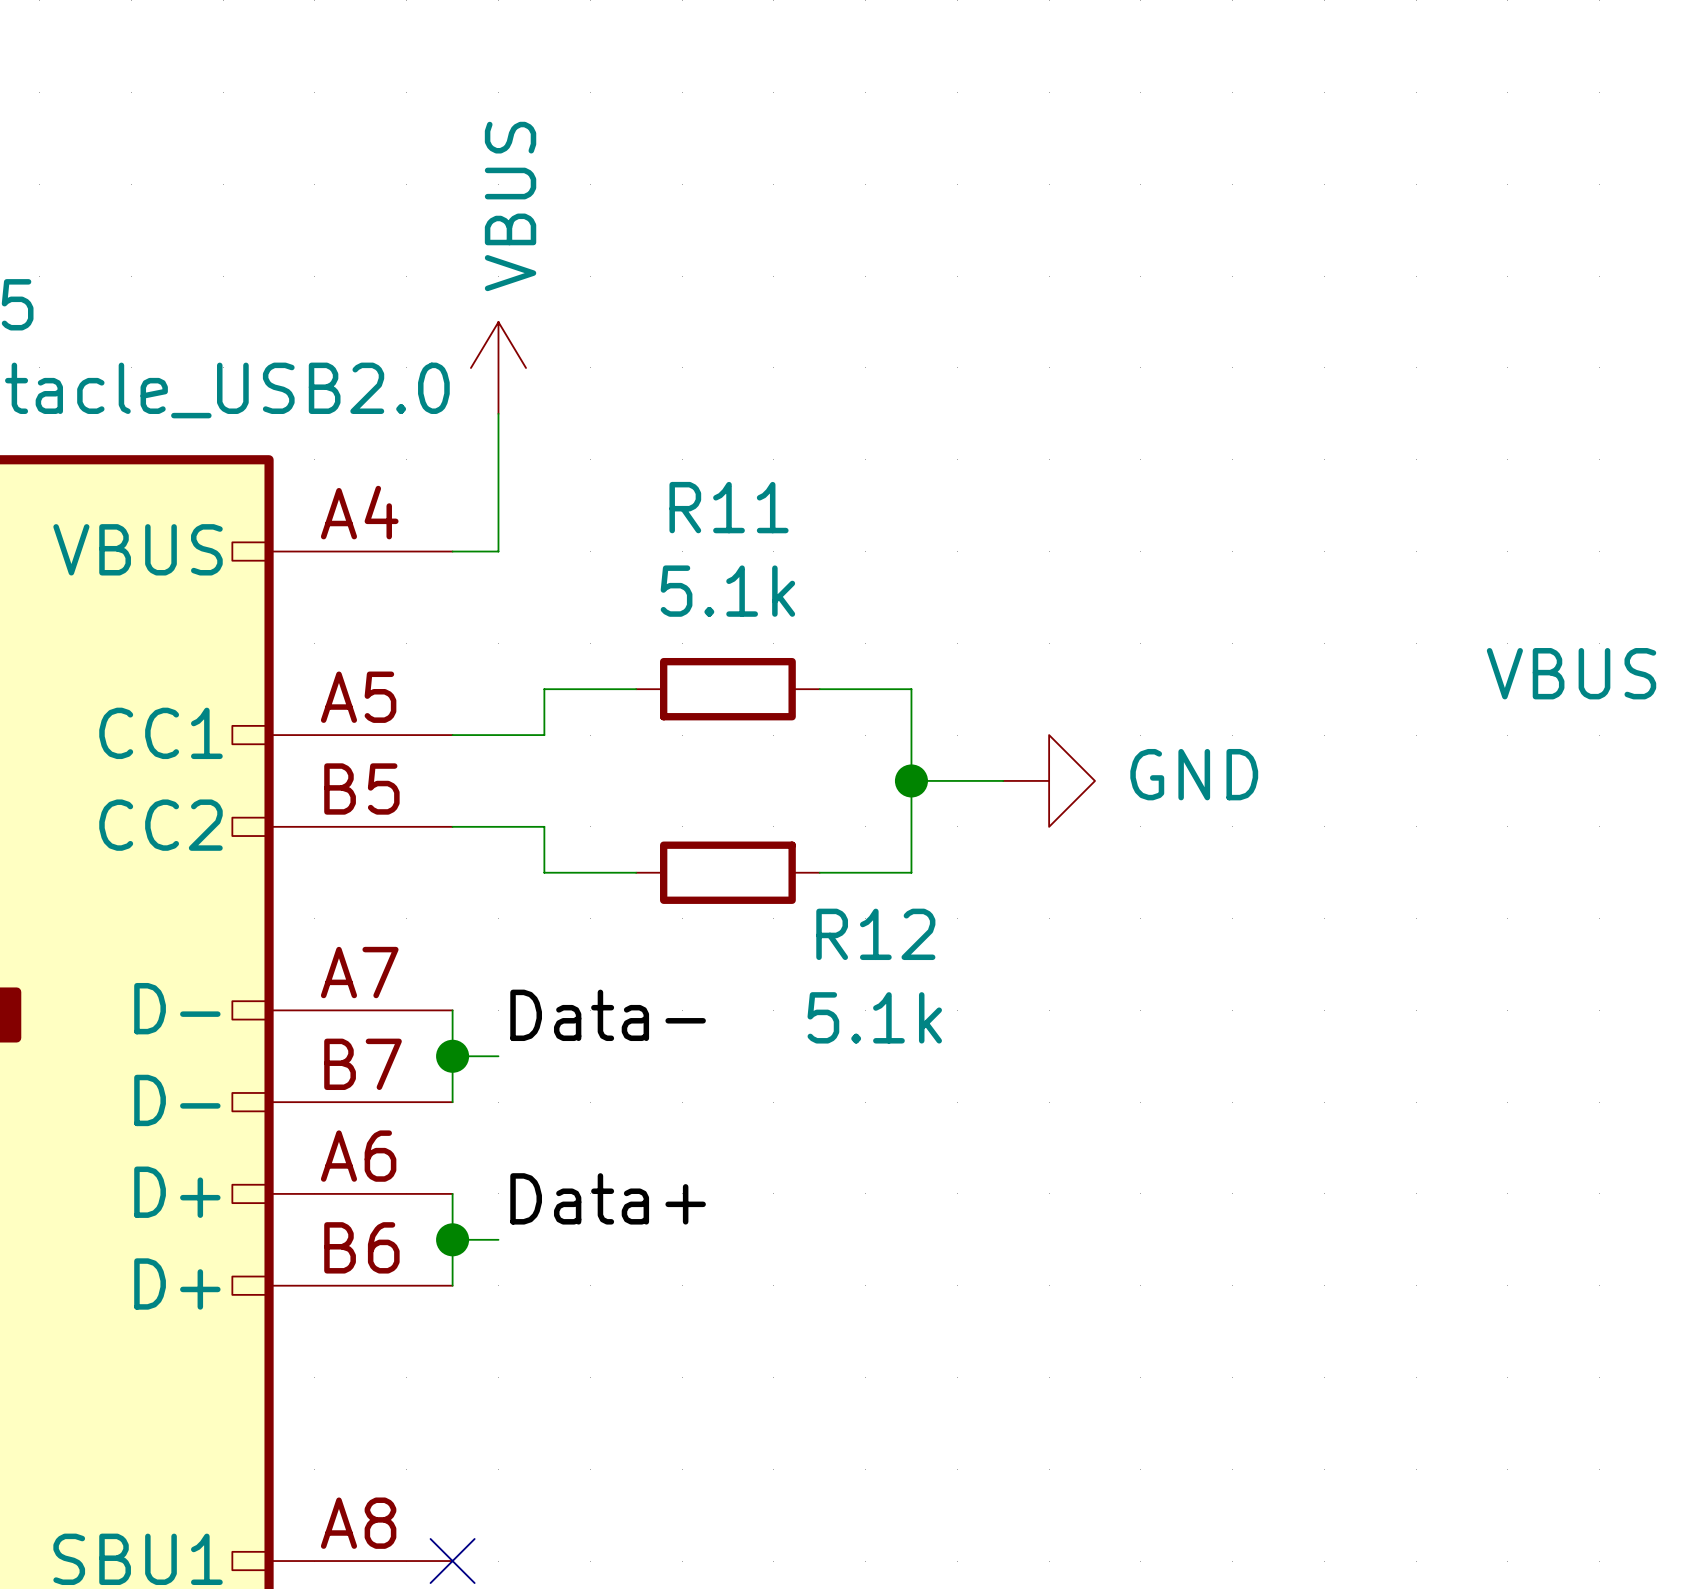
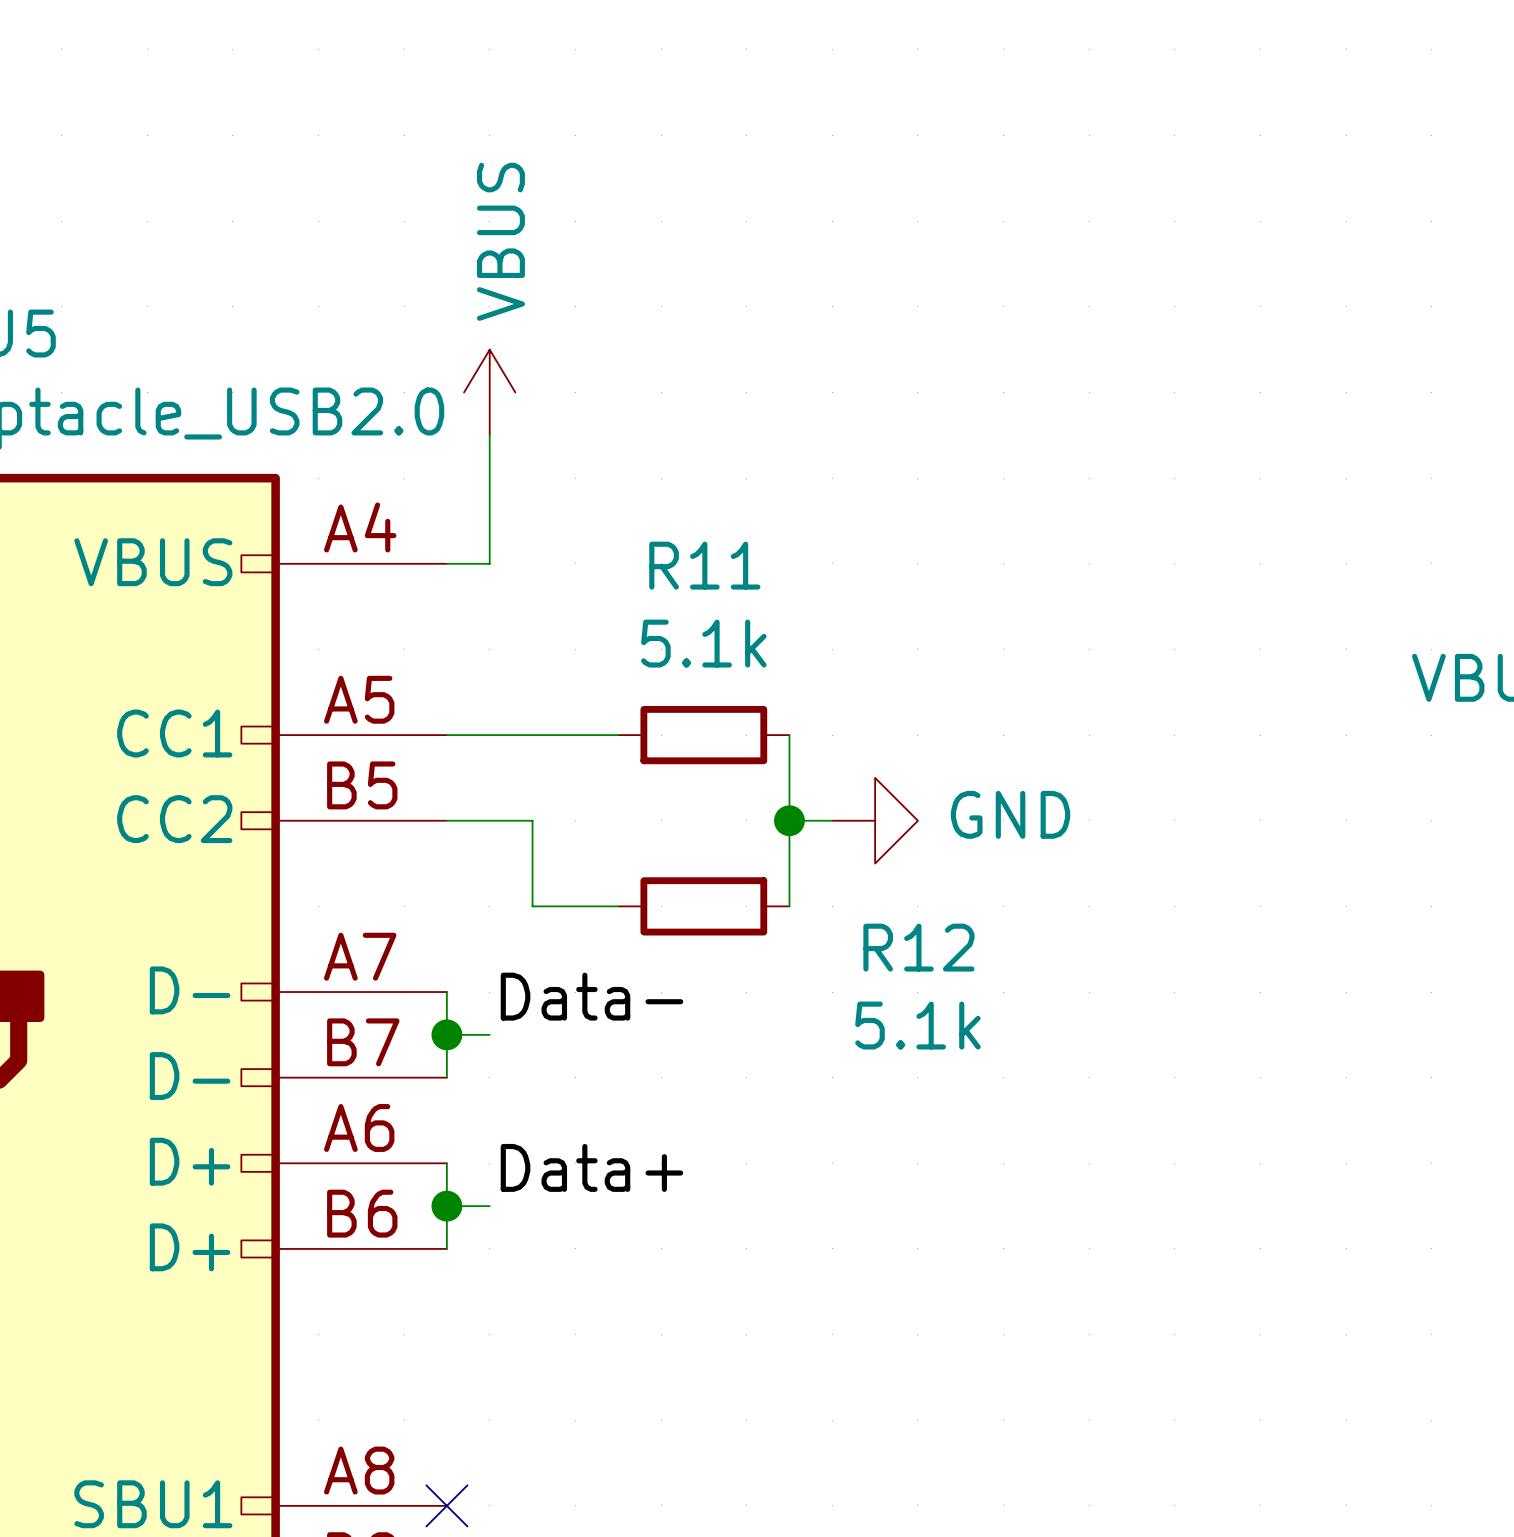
wire: (636, 689) (544, 689) (544, 735) -> (618, 735) (532, 735)
R11 position: (727, 689) -> (703, 735)
wire: (819, 689) (911, 689) (911, 872) (819, 872) -> none
wire: none -> (789, 735) (789, 906)
wire: (911, 780) (1003, 780) -> none
junction position: (911, 780) -> (789, 820)
power symbol position: GND (1049, 780) -> GND (875, 820)
wire: none -> (789, 820) (832, 820)
wire: (544, 872) (636, 872) -> (532, 863) (532, 906) (618, 906)
R12 position: (727, 872) -> (703, 906)
R12 name position: R12 (875, 934) -> R12 (918, 947)
R12 value position: 5.1k (874, 1017) -> 5.1k (917, 1025)

